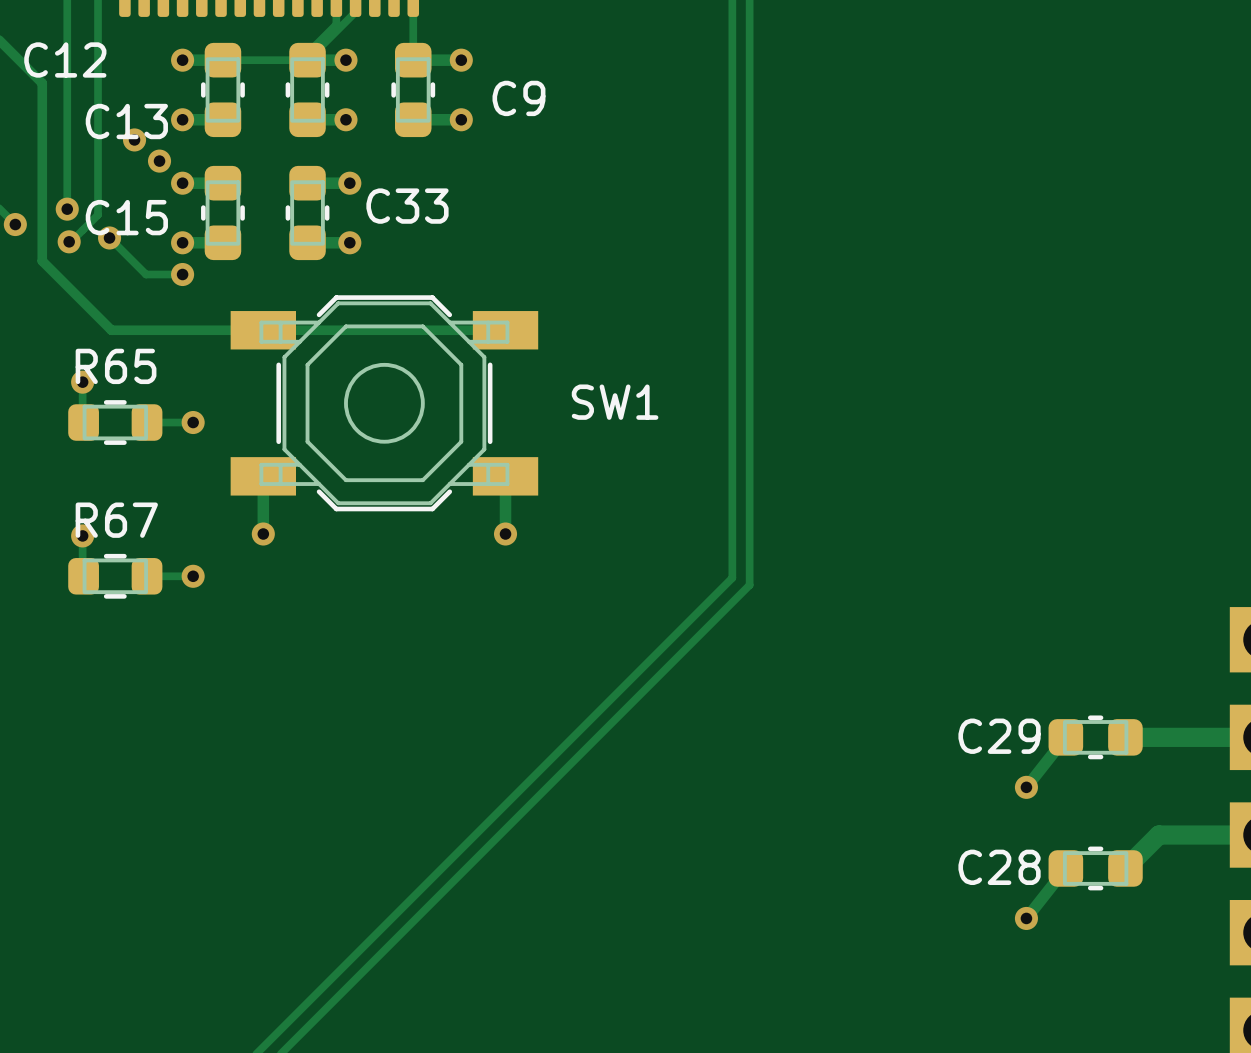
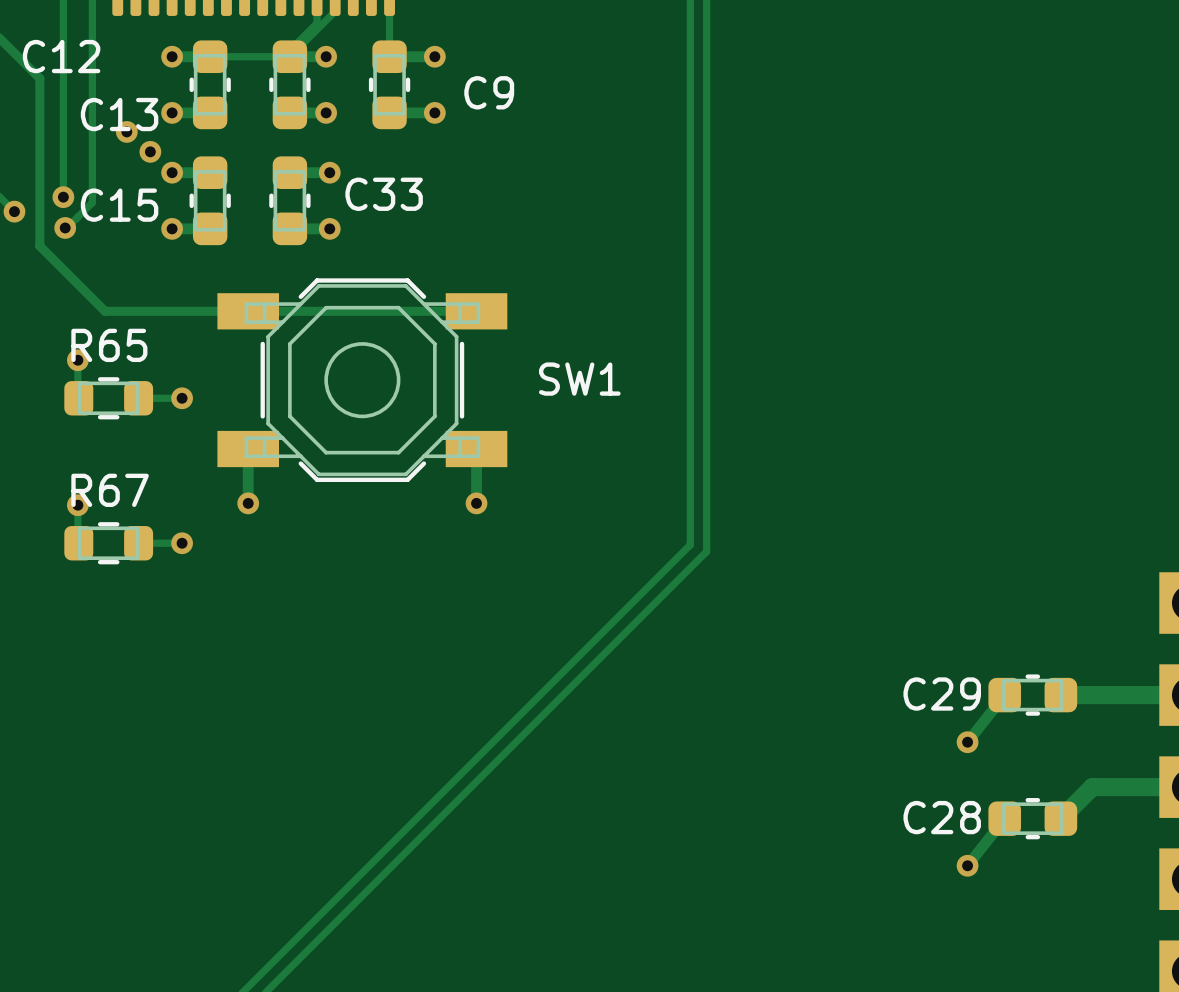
track: (109, 237) (146, 274) (182, 274) -> none
via: (109, 237) -> none
via: (182, 274) -> none

